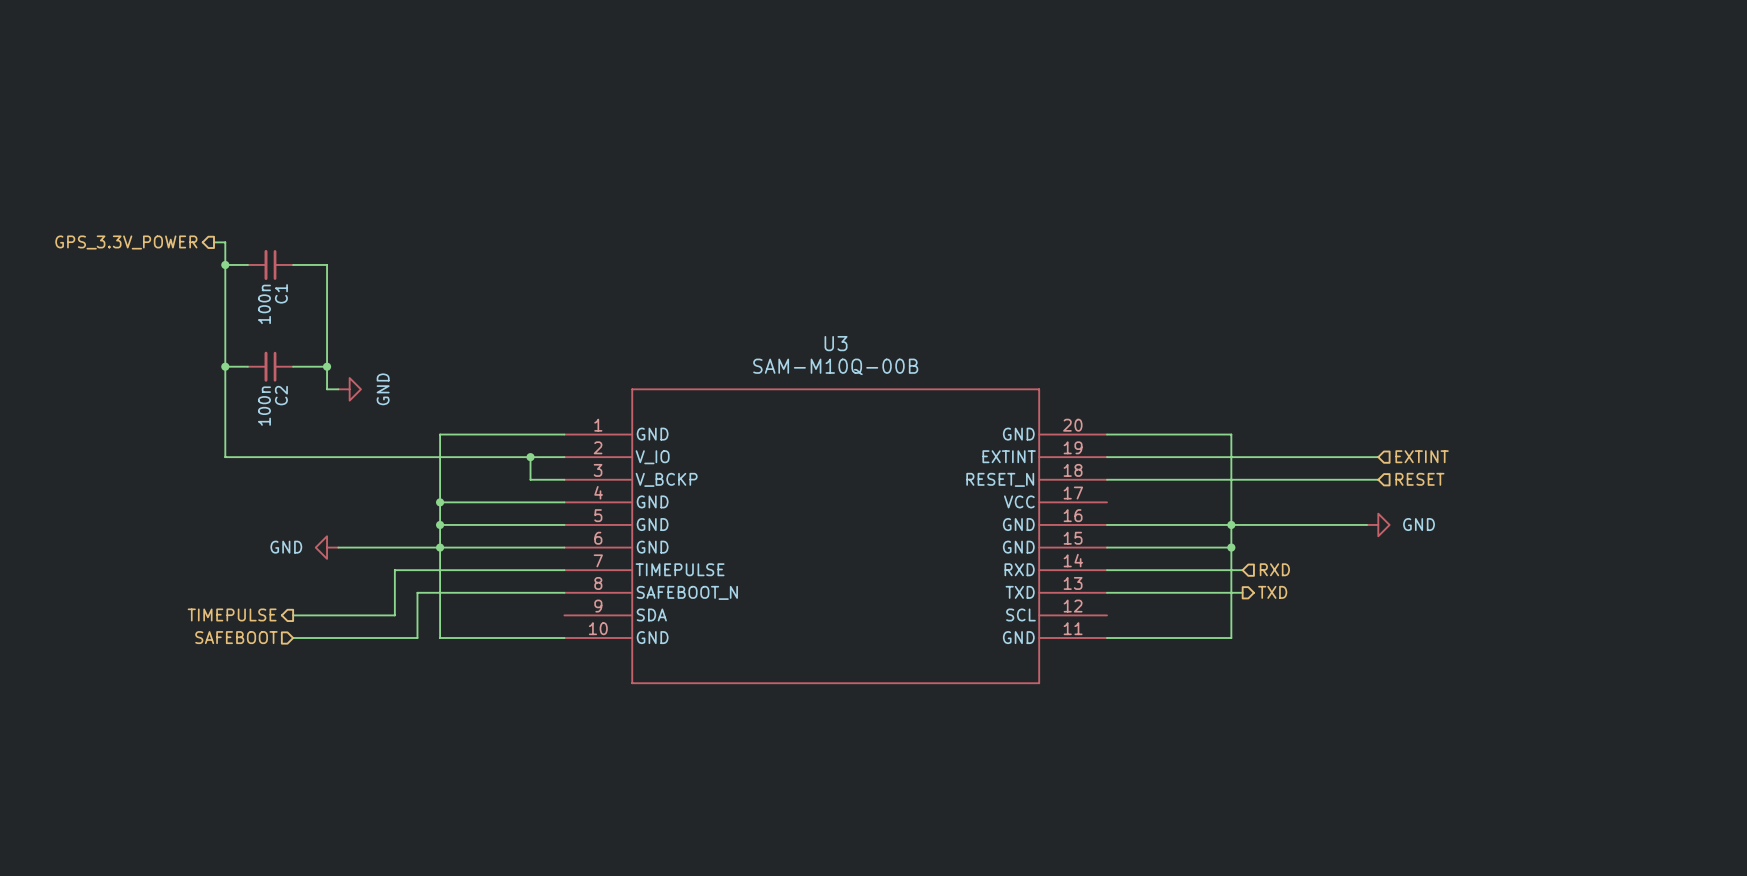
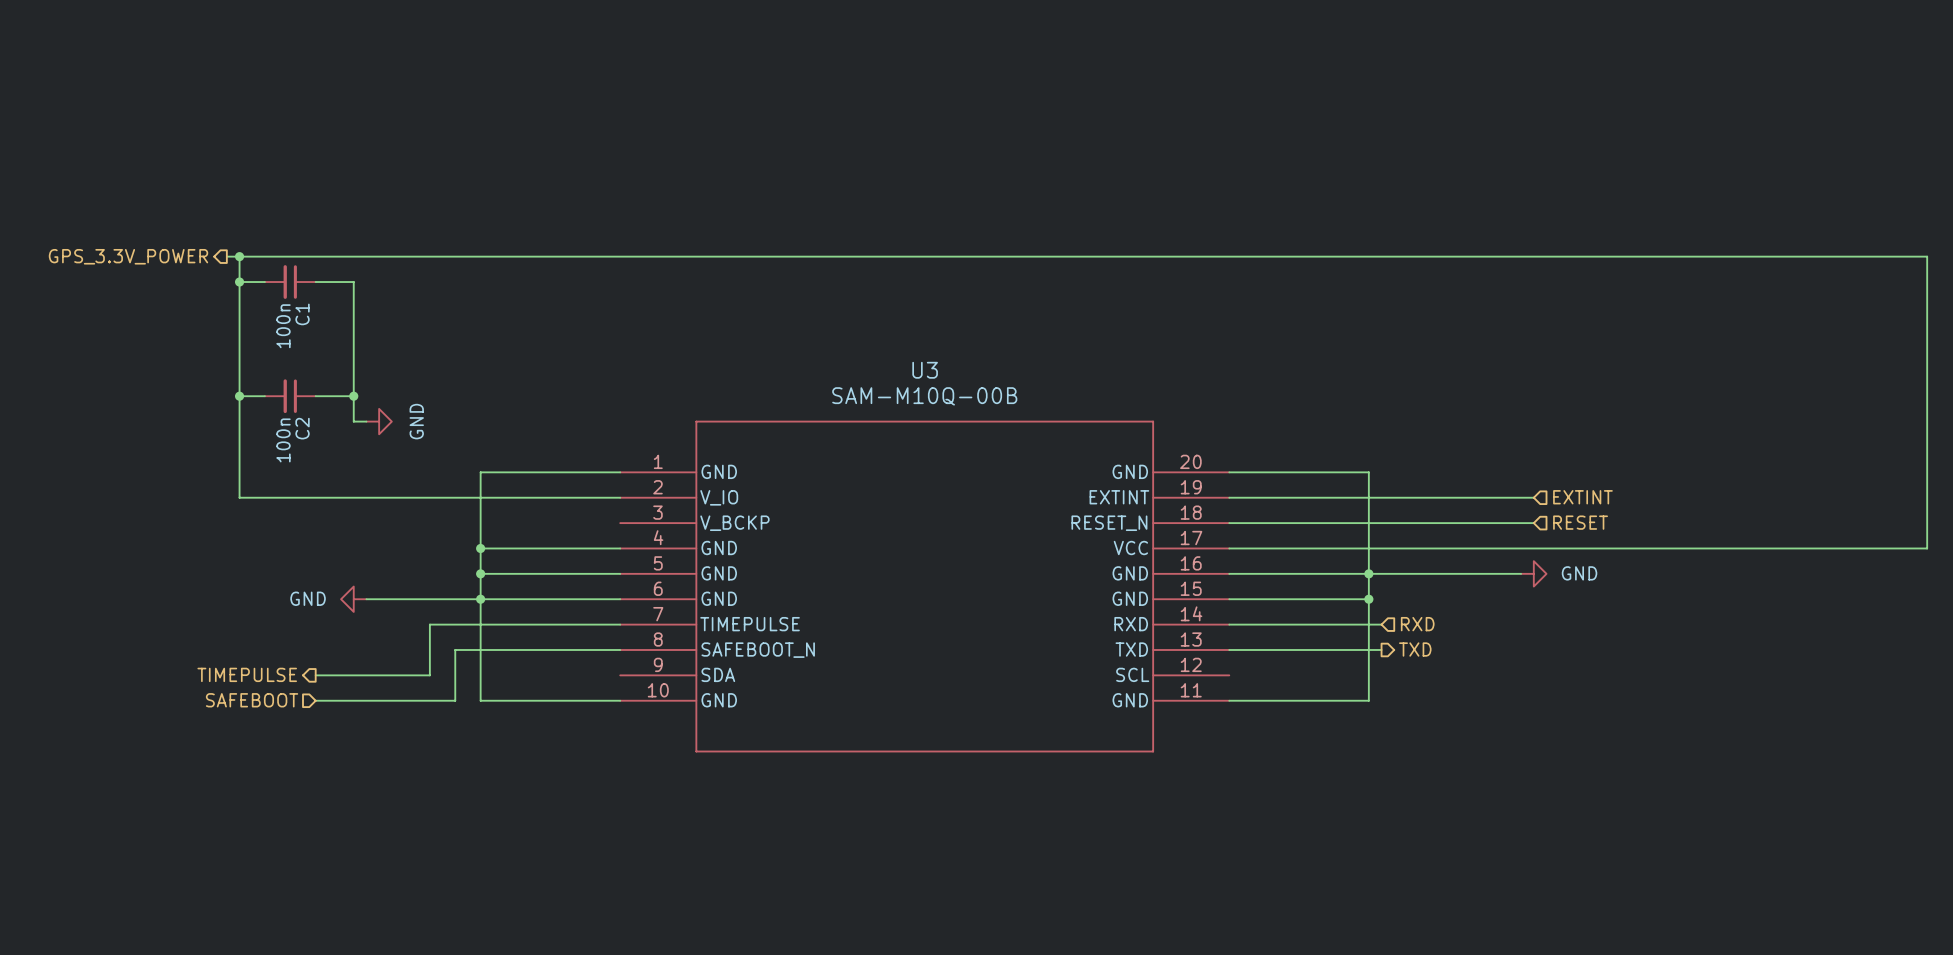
wire: none -> (239, 256) (1927, 256) (1927, 548) (1229, 548)
junction: none -> (239, 256)
wire: (530, 457) (530, 479) (564, 479) -> none
junction: (530, 457) -> none

